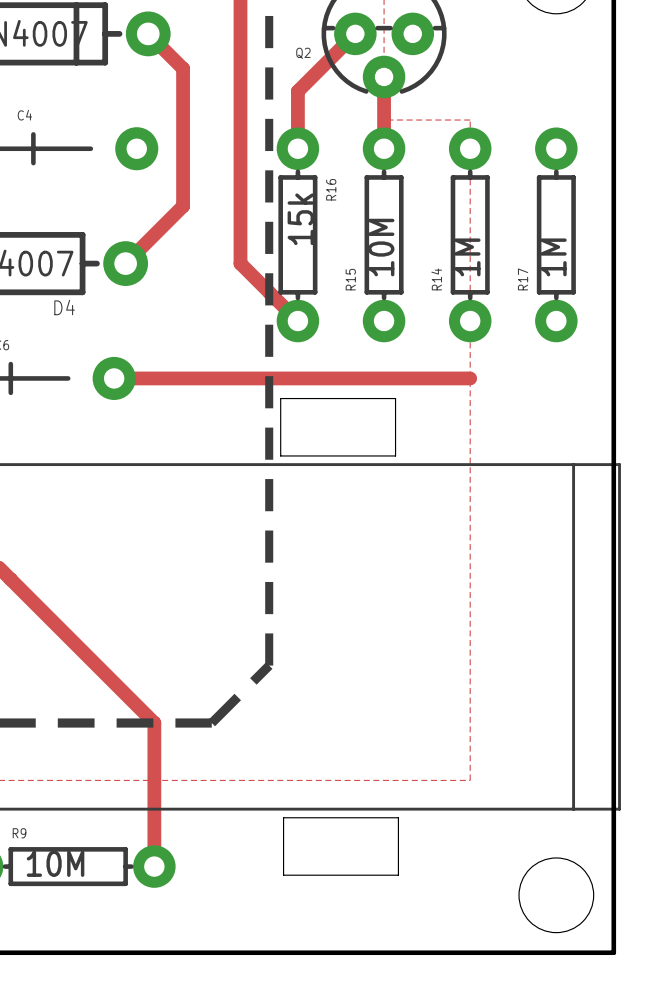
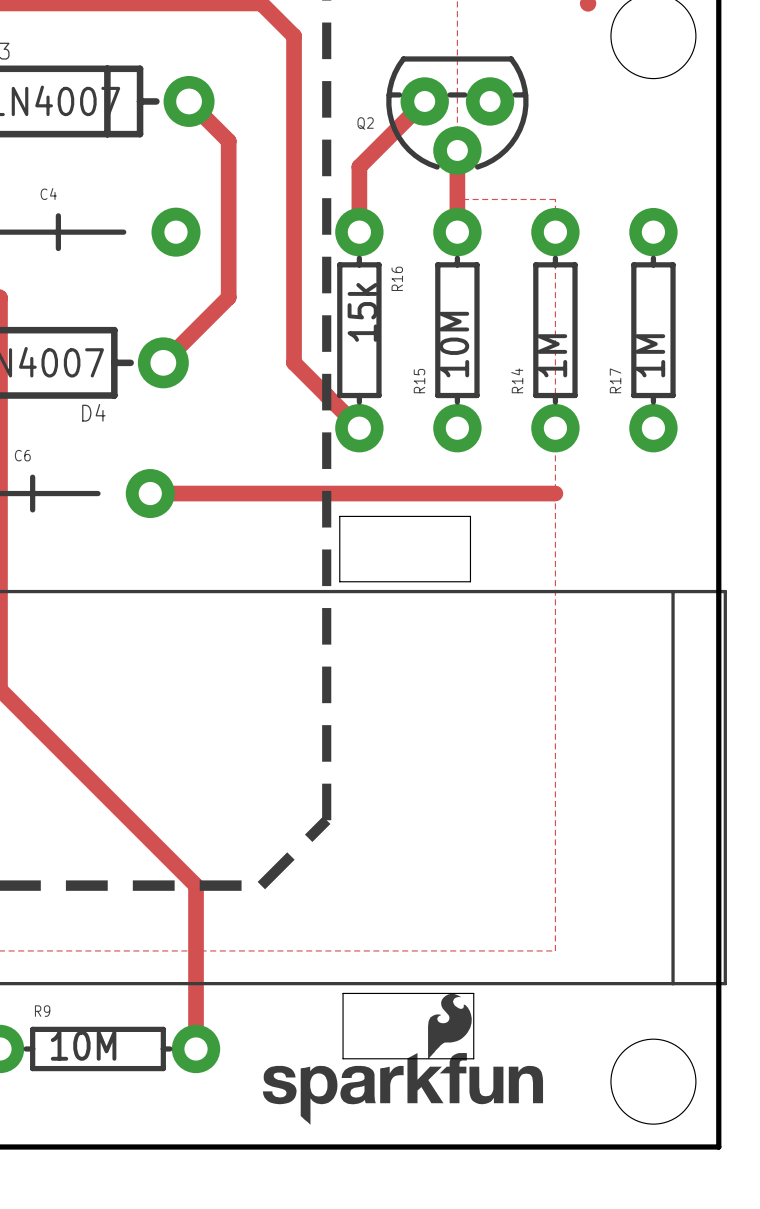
drawing: none -> [262, 993, 544, 1125]

